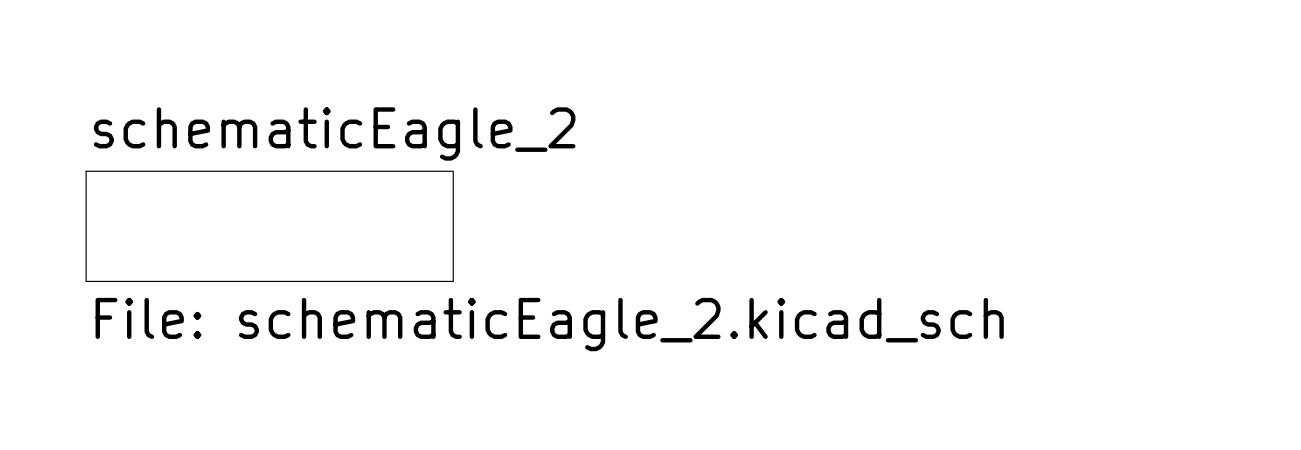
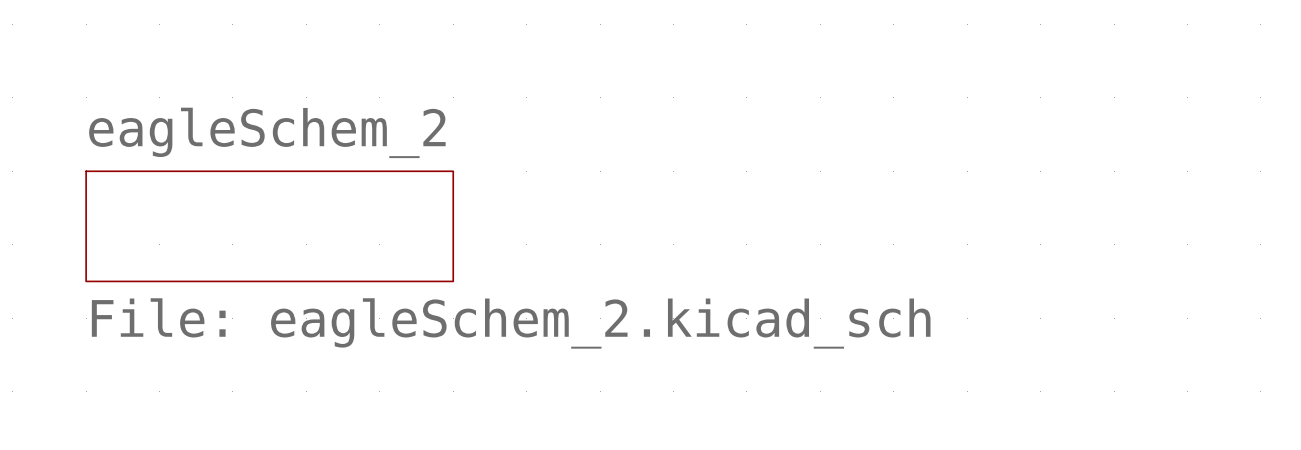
sheet schematicEagle_2 name: schematicEagle_2 (334, 133) -> eagleSchem_2 (267, 132)
sheet schematicEagle_2 value: File: schematicEagle_2.kicad_sch (549, 324) -> File: eagleSchem_2.kicad_sch (511, 323)

